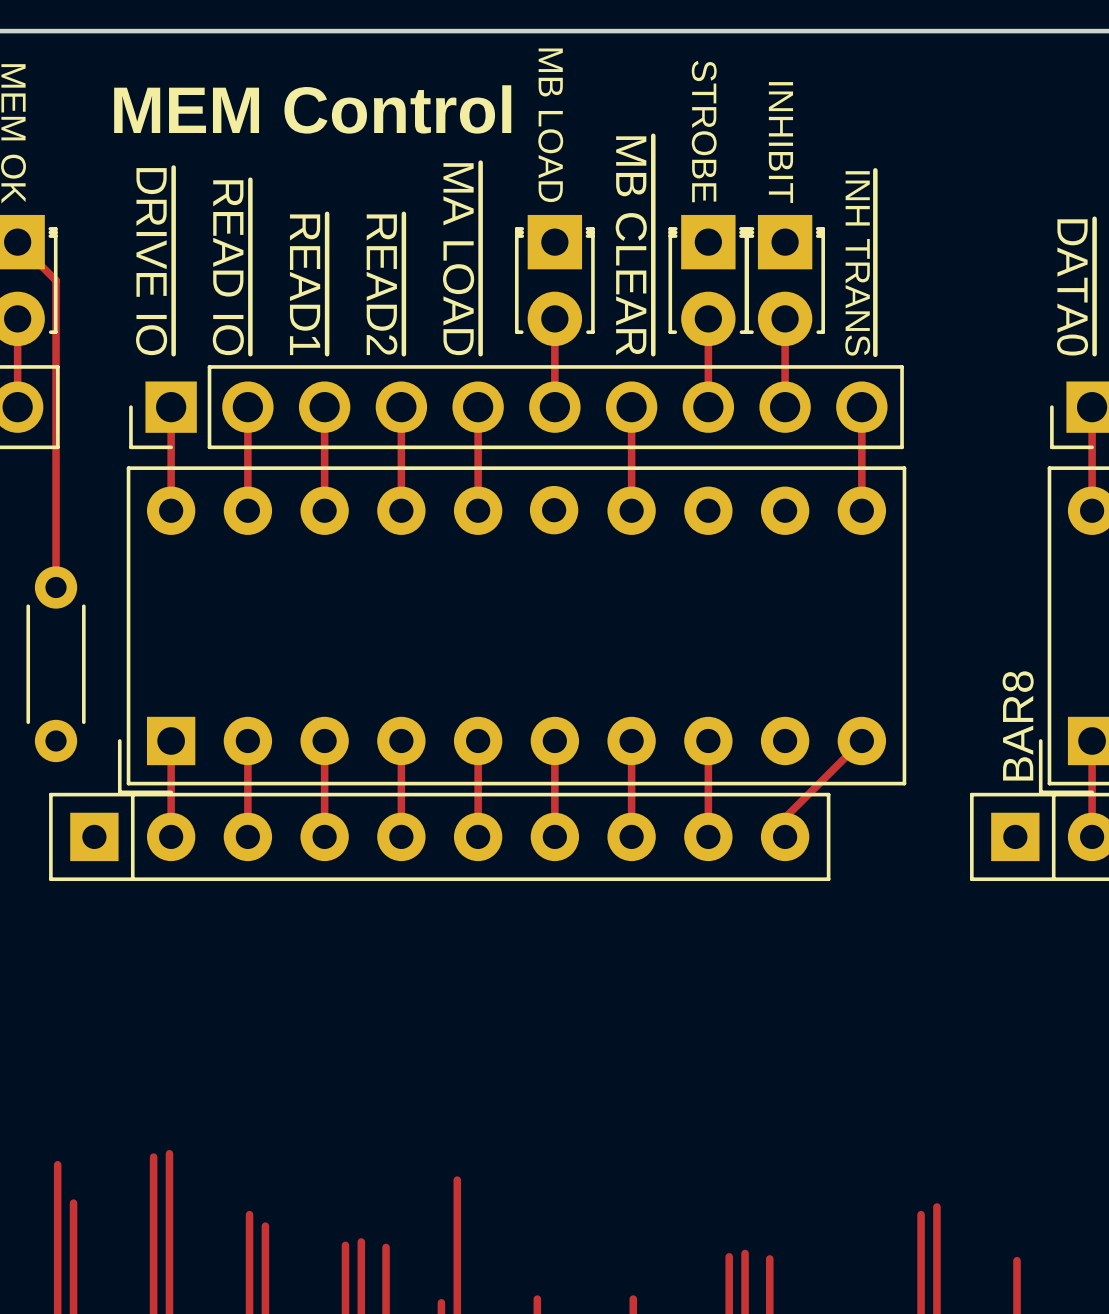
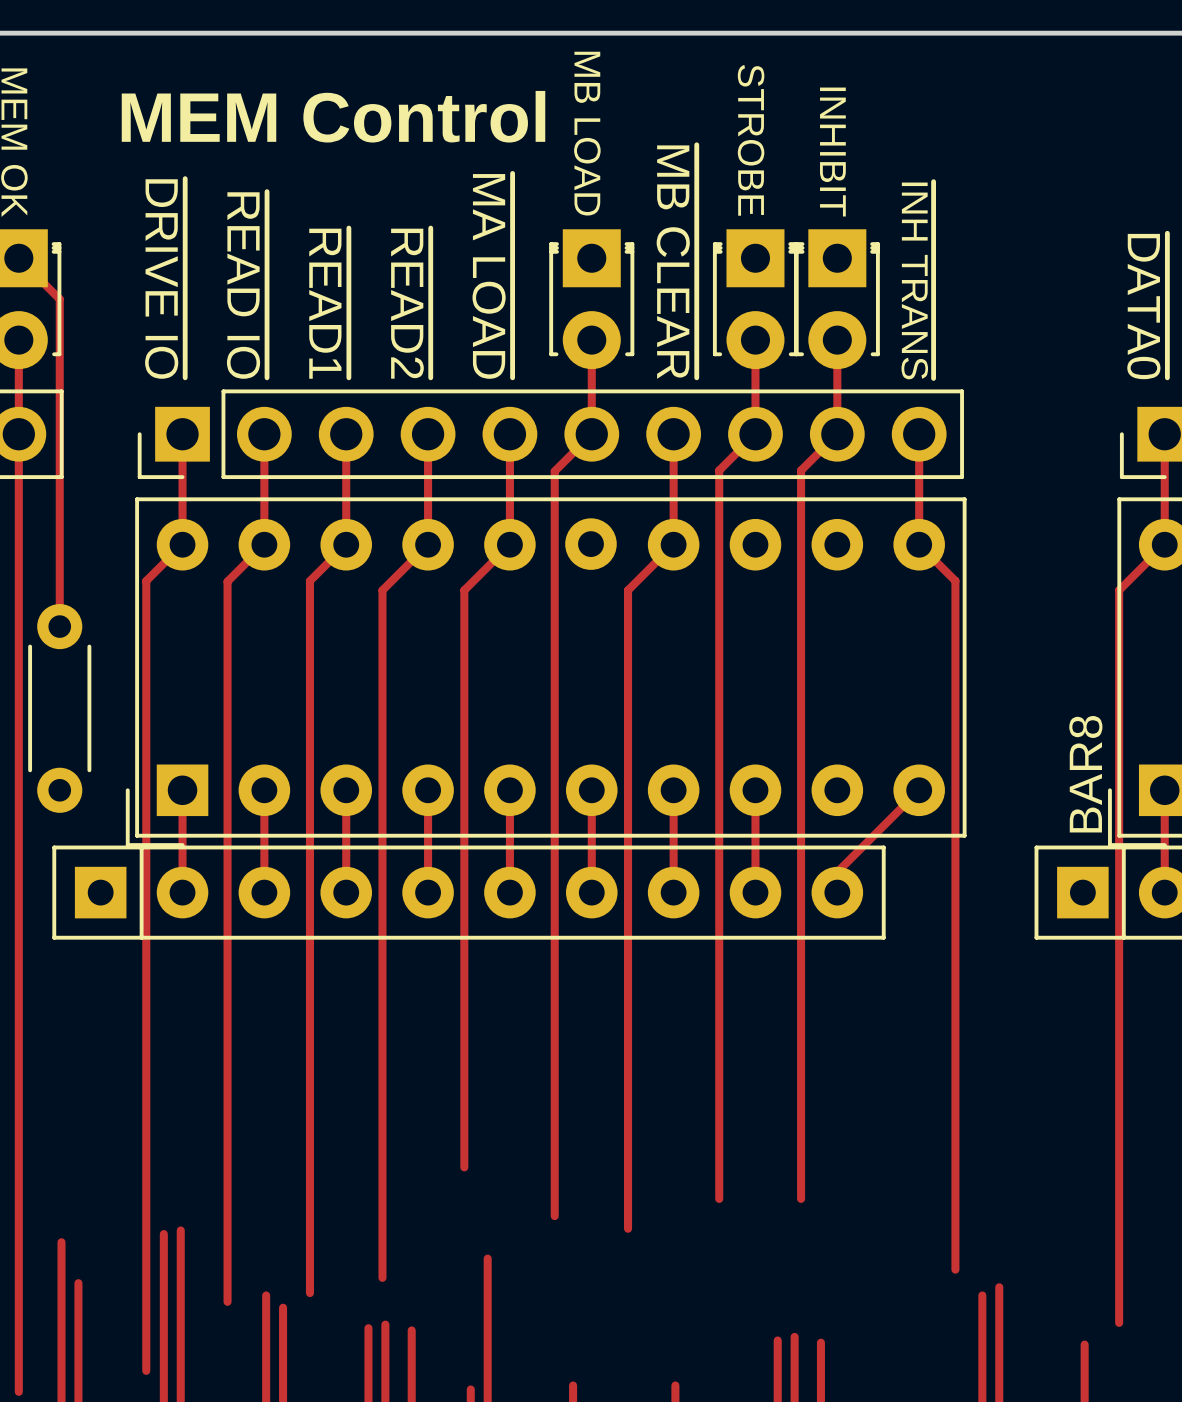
top track: none -> (18, 434) (18, 1391)
top track: none -> (591, 434) (554, 471) (554, 1216)
top track: none -> (755, 434) (719, 470) (719, 1198)
top track: none -> (837, 434) (801, 470) (801, 1198)
top track: none -> (182, 544) (146, 580) (146, 1370)
top track: none -> (264, 544) (227, 581) (227, 1301)
top track: none -> (346, 544) (309, 580) (309, 1293)
top track: none -> (428, 544) (382, 590) (382, 1277)
top track: none -> (509, 544) (464, 590) (464, 1167)
top track: none -> (673, 544) (628, 590) (628, 1228)
top track: none -> (919, 544) (955, 580) (955, 1269)
top track: none -> (1164, 544) (1119, 590) (1119, 1322)

